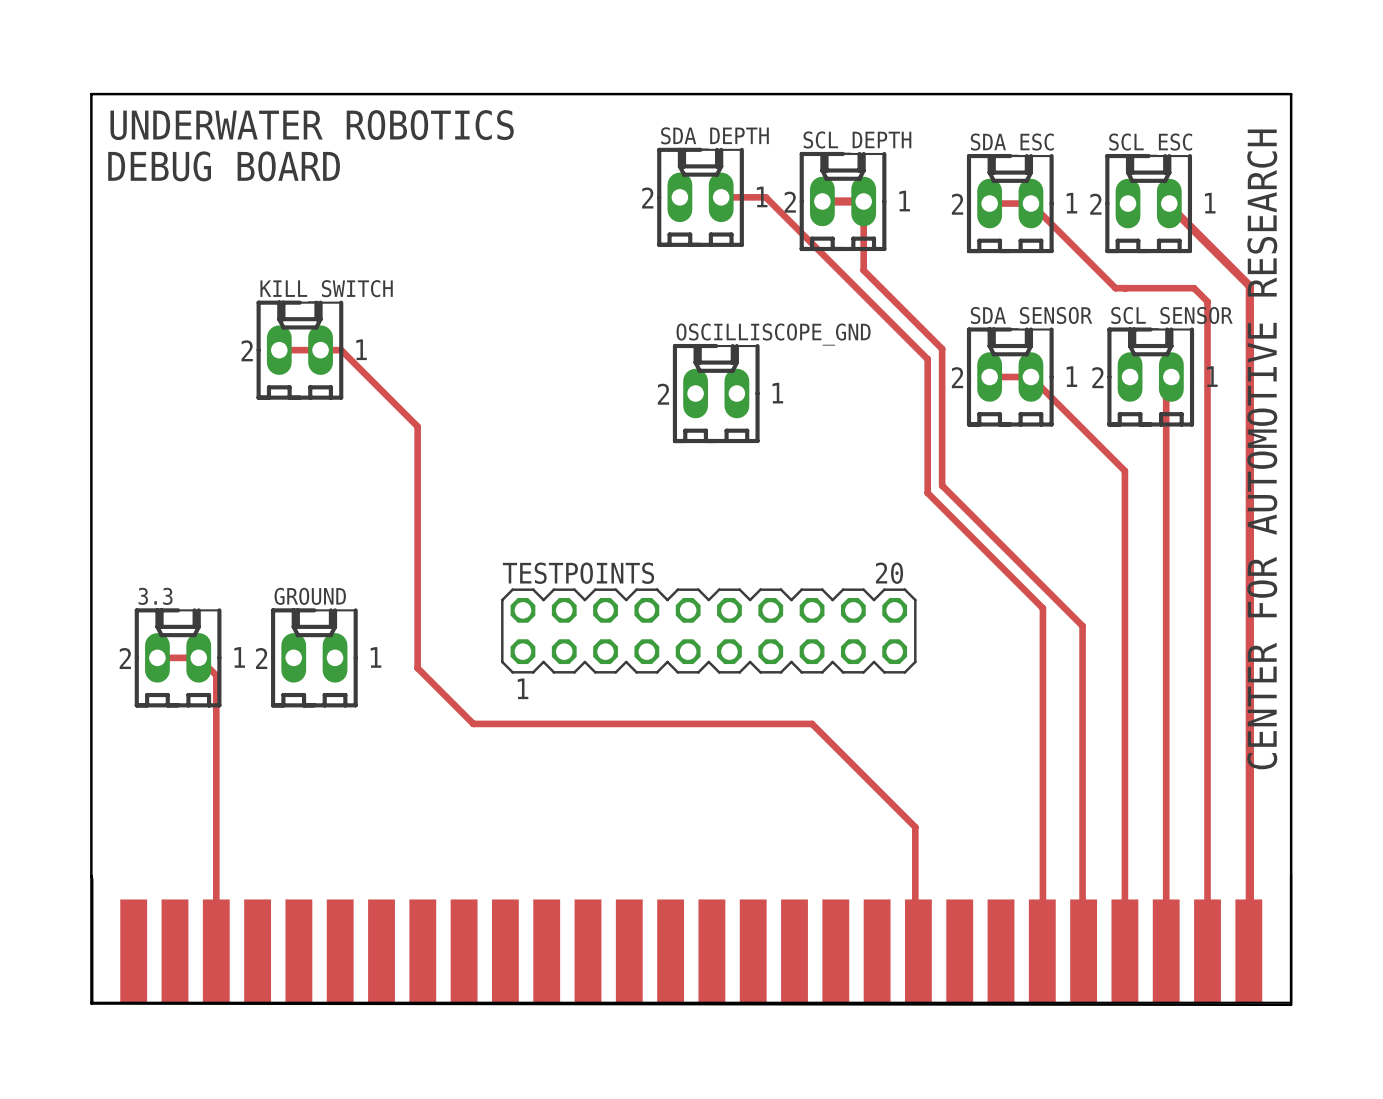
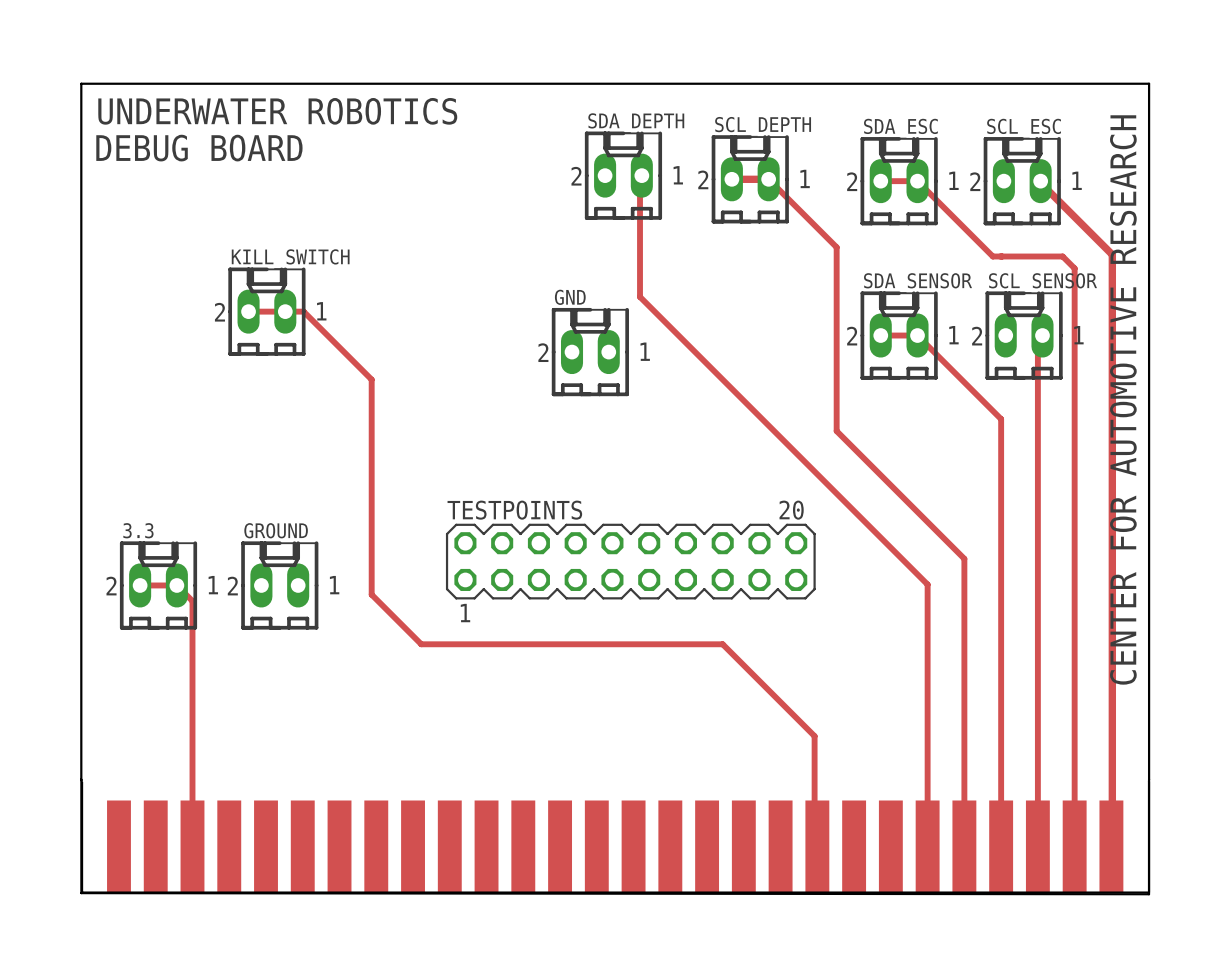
track: (721, 197) (765, 197) (927, 359) (927, 493) (1042, 608) (1042, 967) (1041, 968) (1042, 951) -> (640, 177) (640, 296) (927, 584) (927, 846)
track: (863, 201) (863, 270) (942, 348) (942, 485) (1082, 626) (1083, 951) -> (768, 179) (836, 247) (836, 431) (964, 558) (964, 846)
OSCILLISCOPE_GND: (716, 393) -> none
GND: none -> (590, 352)

